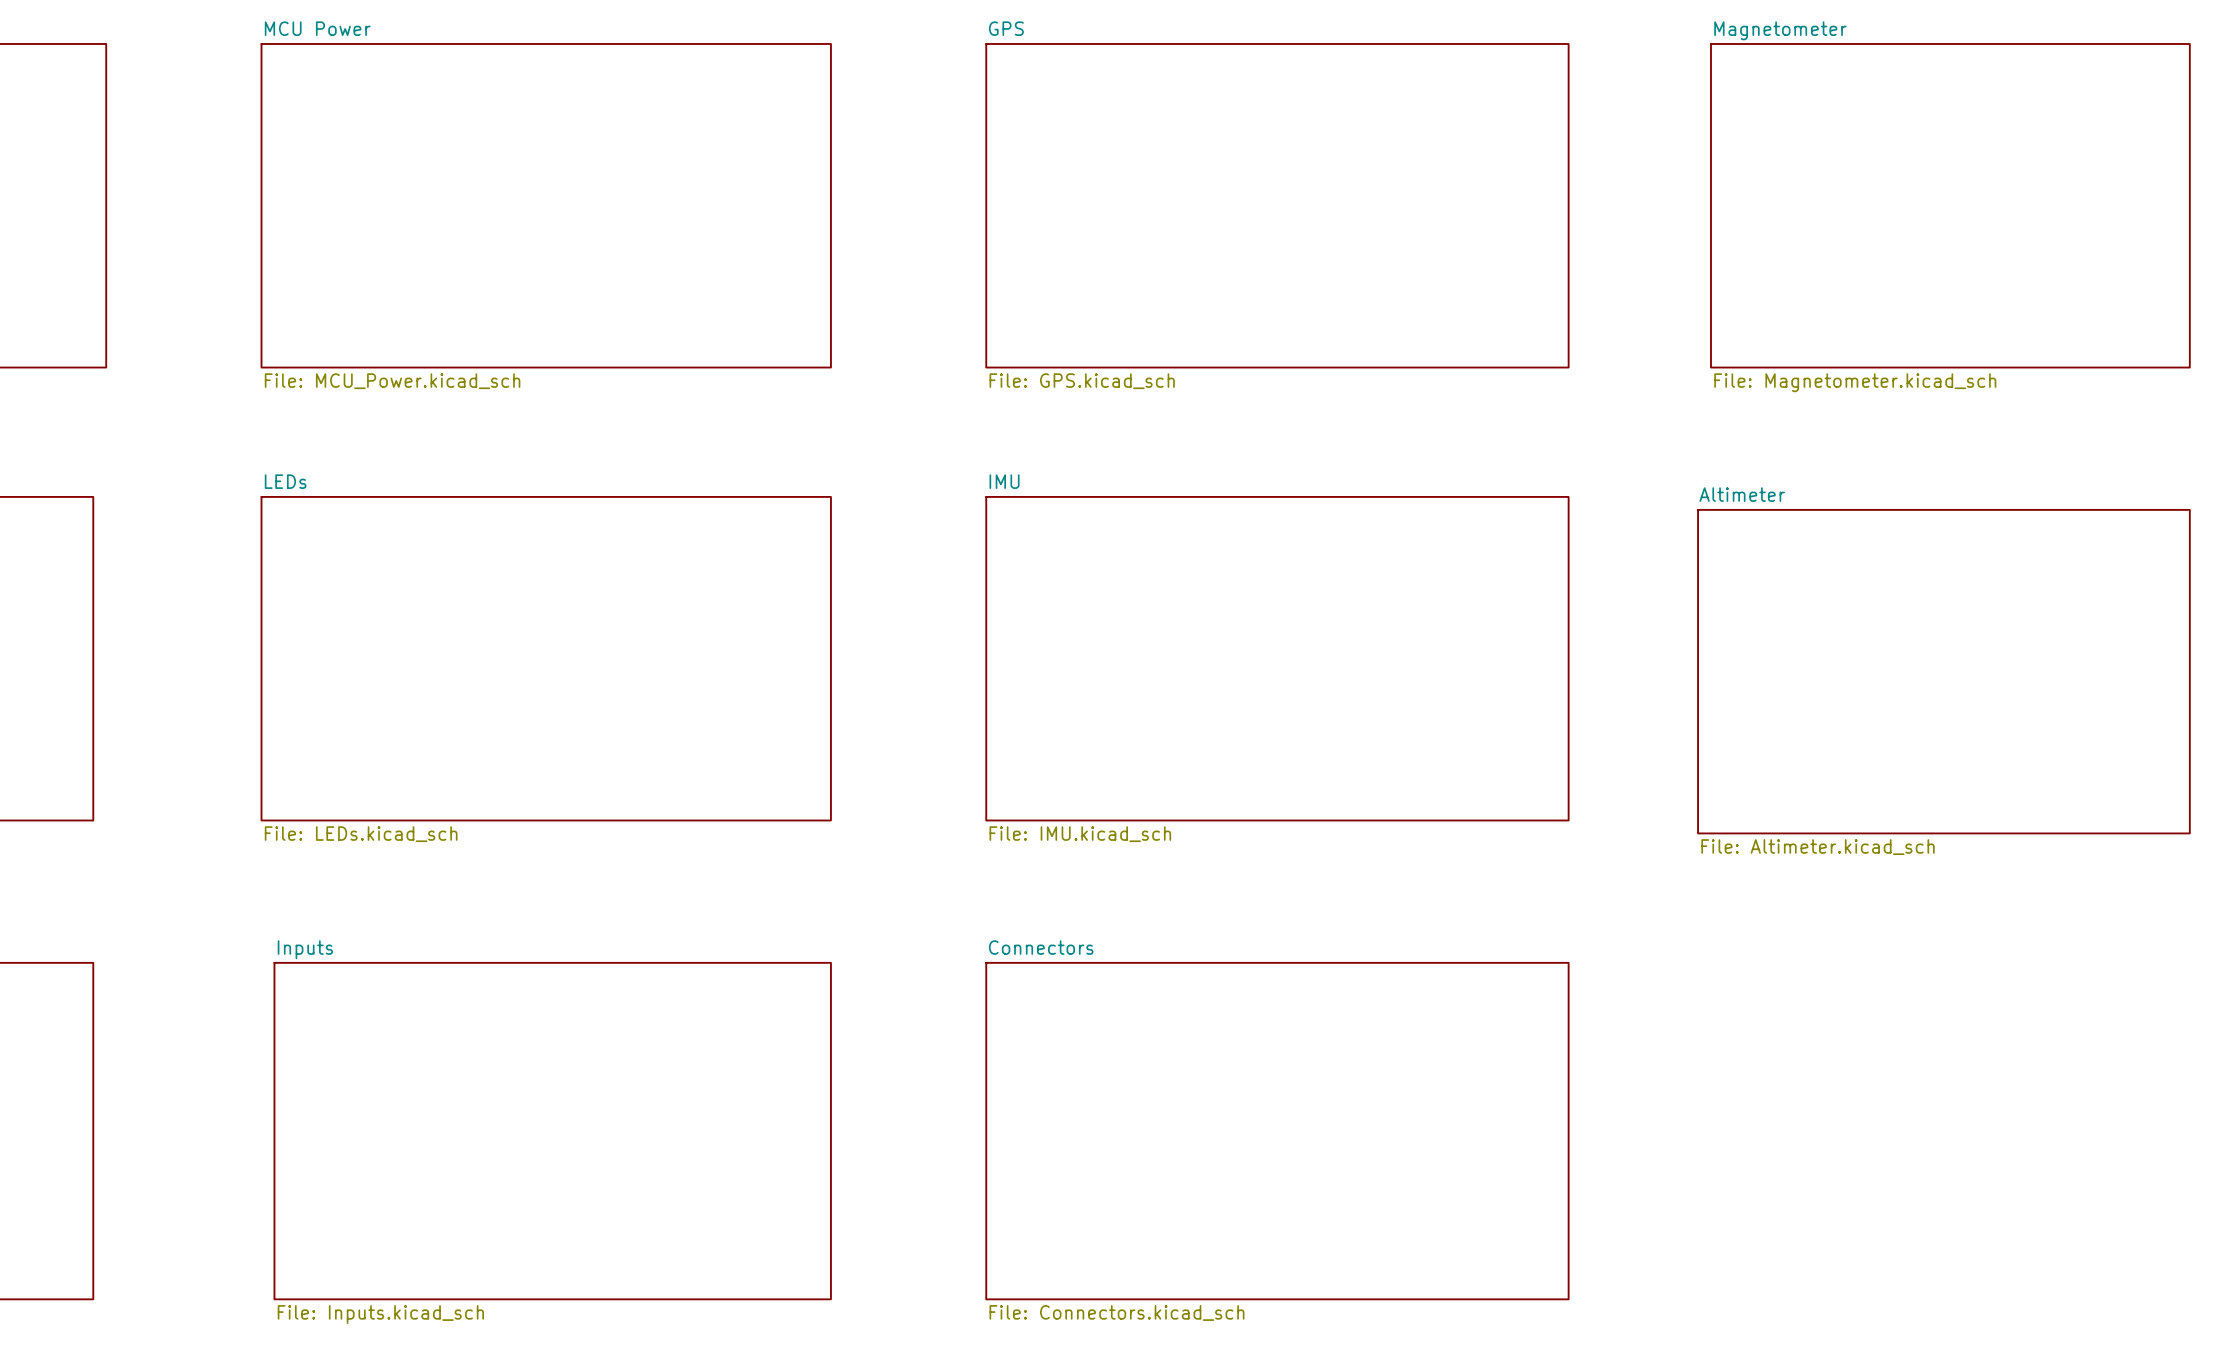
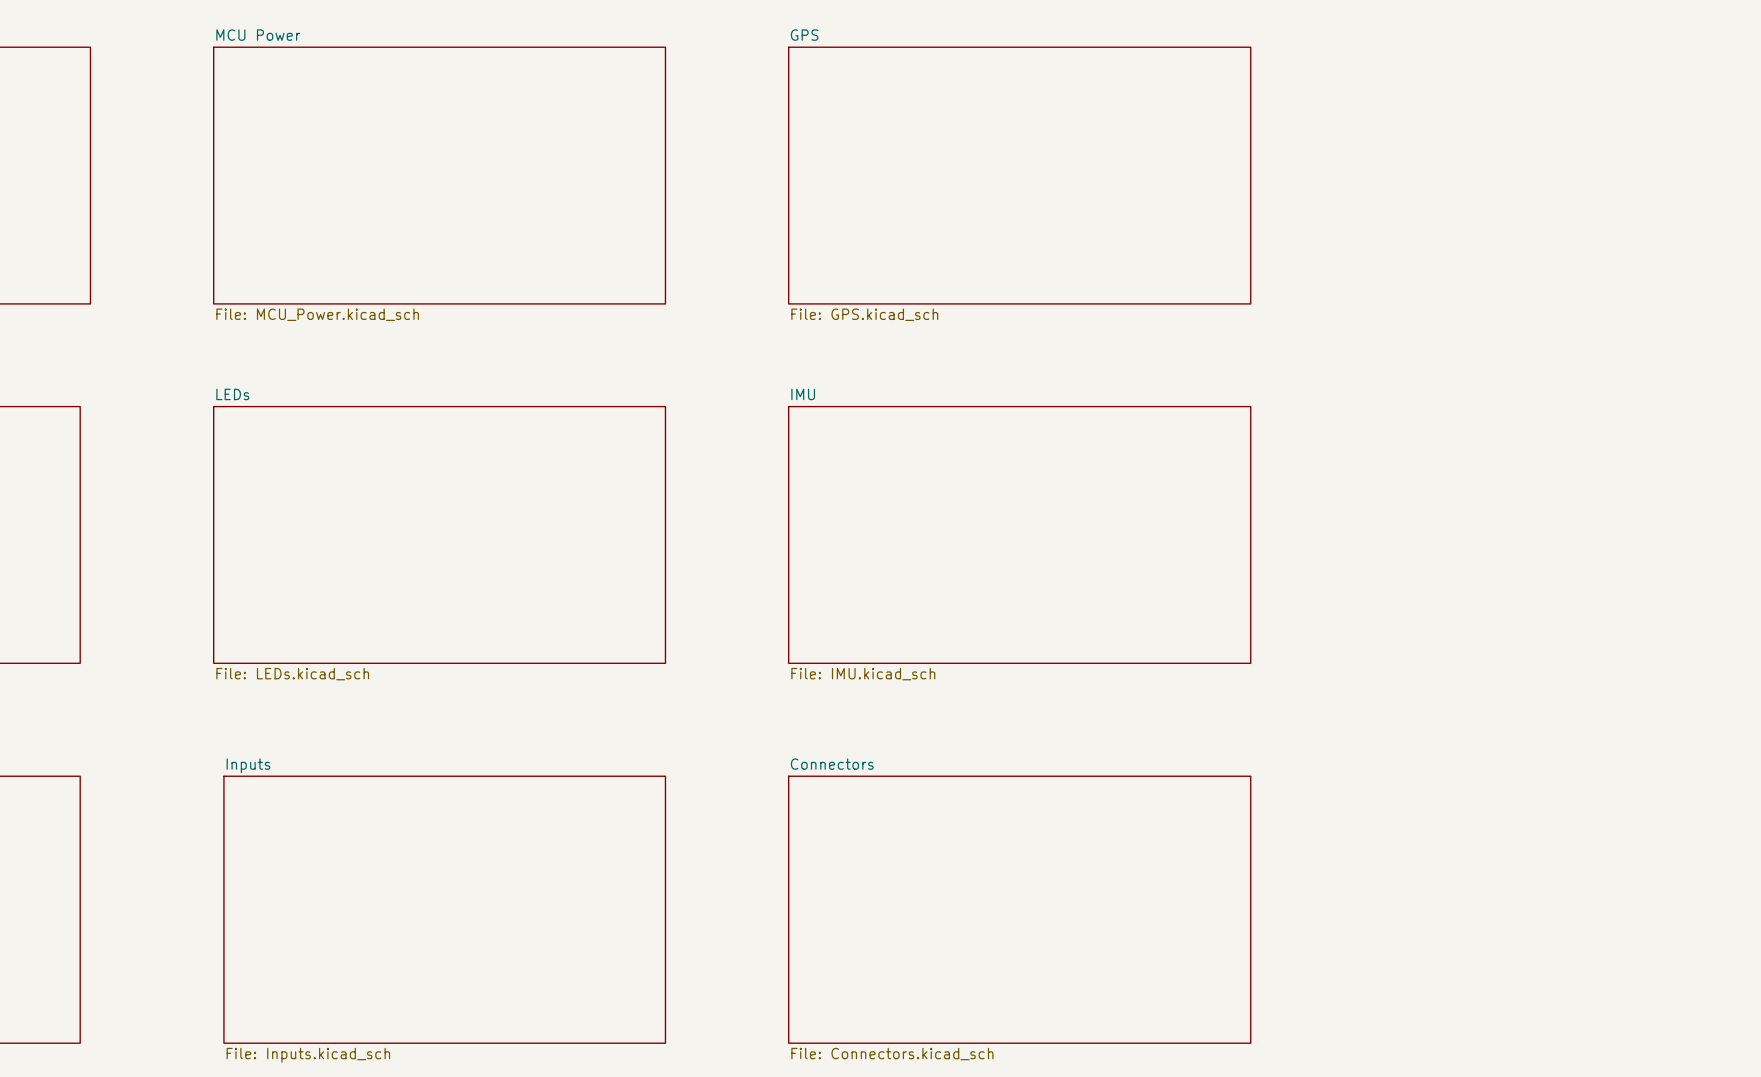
sheet Magnetometer: File: Magnetometer.kicad_sch (1950, 205) -> none
sheet Altimeter: File: Altimeter.kicad_sch (1943, 671) -> none

